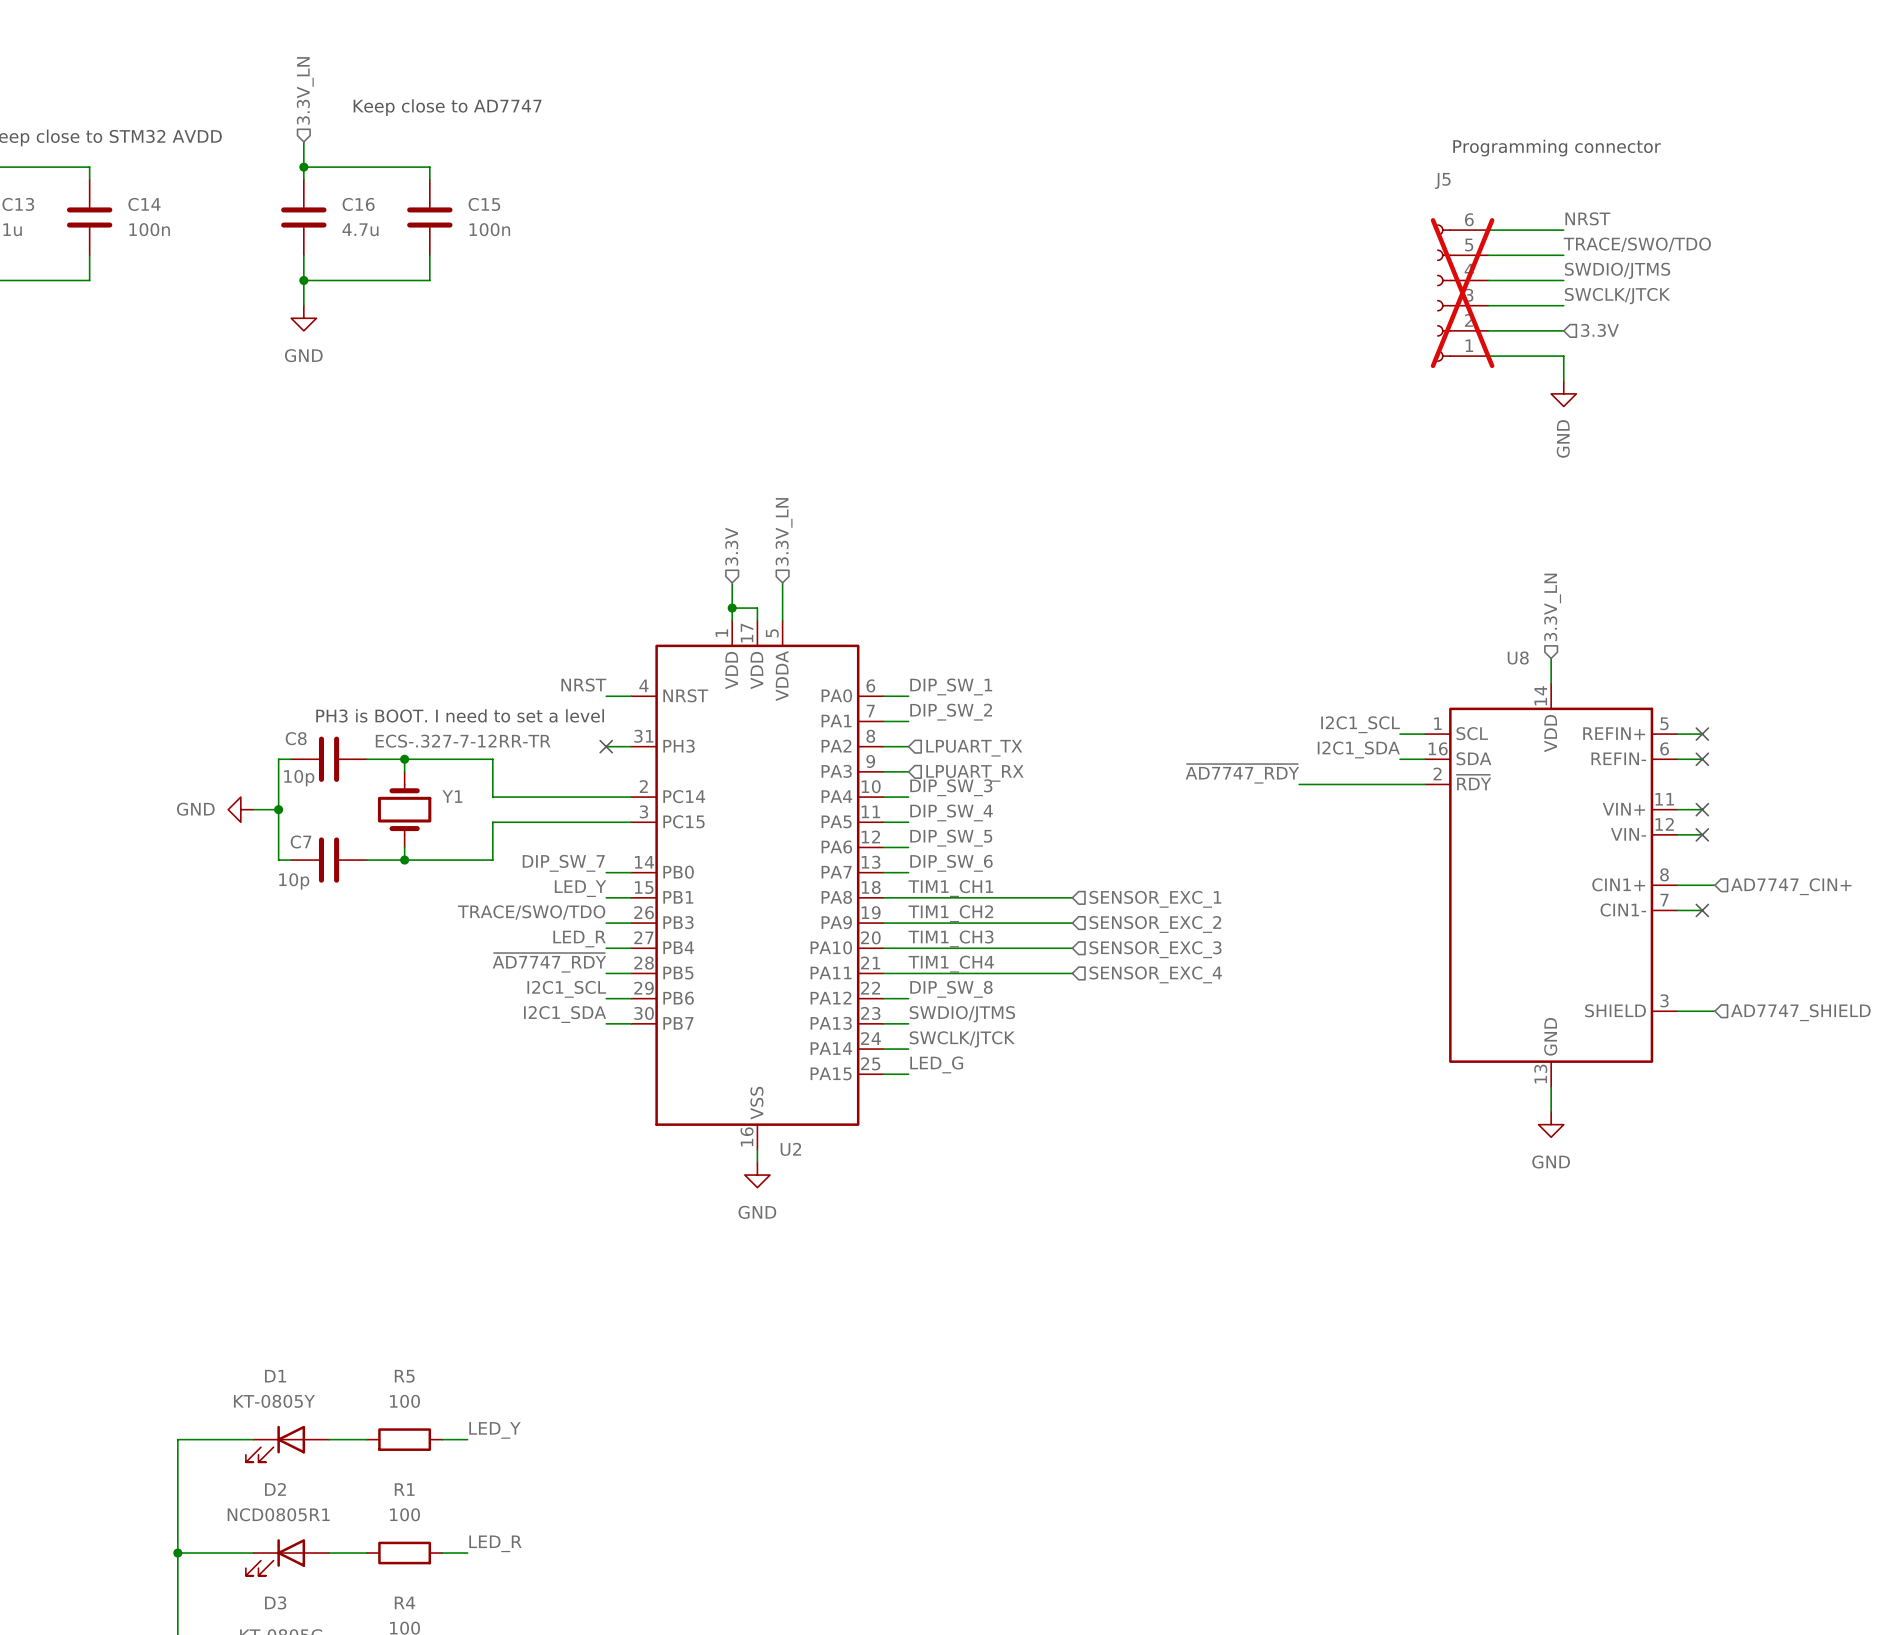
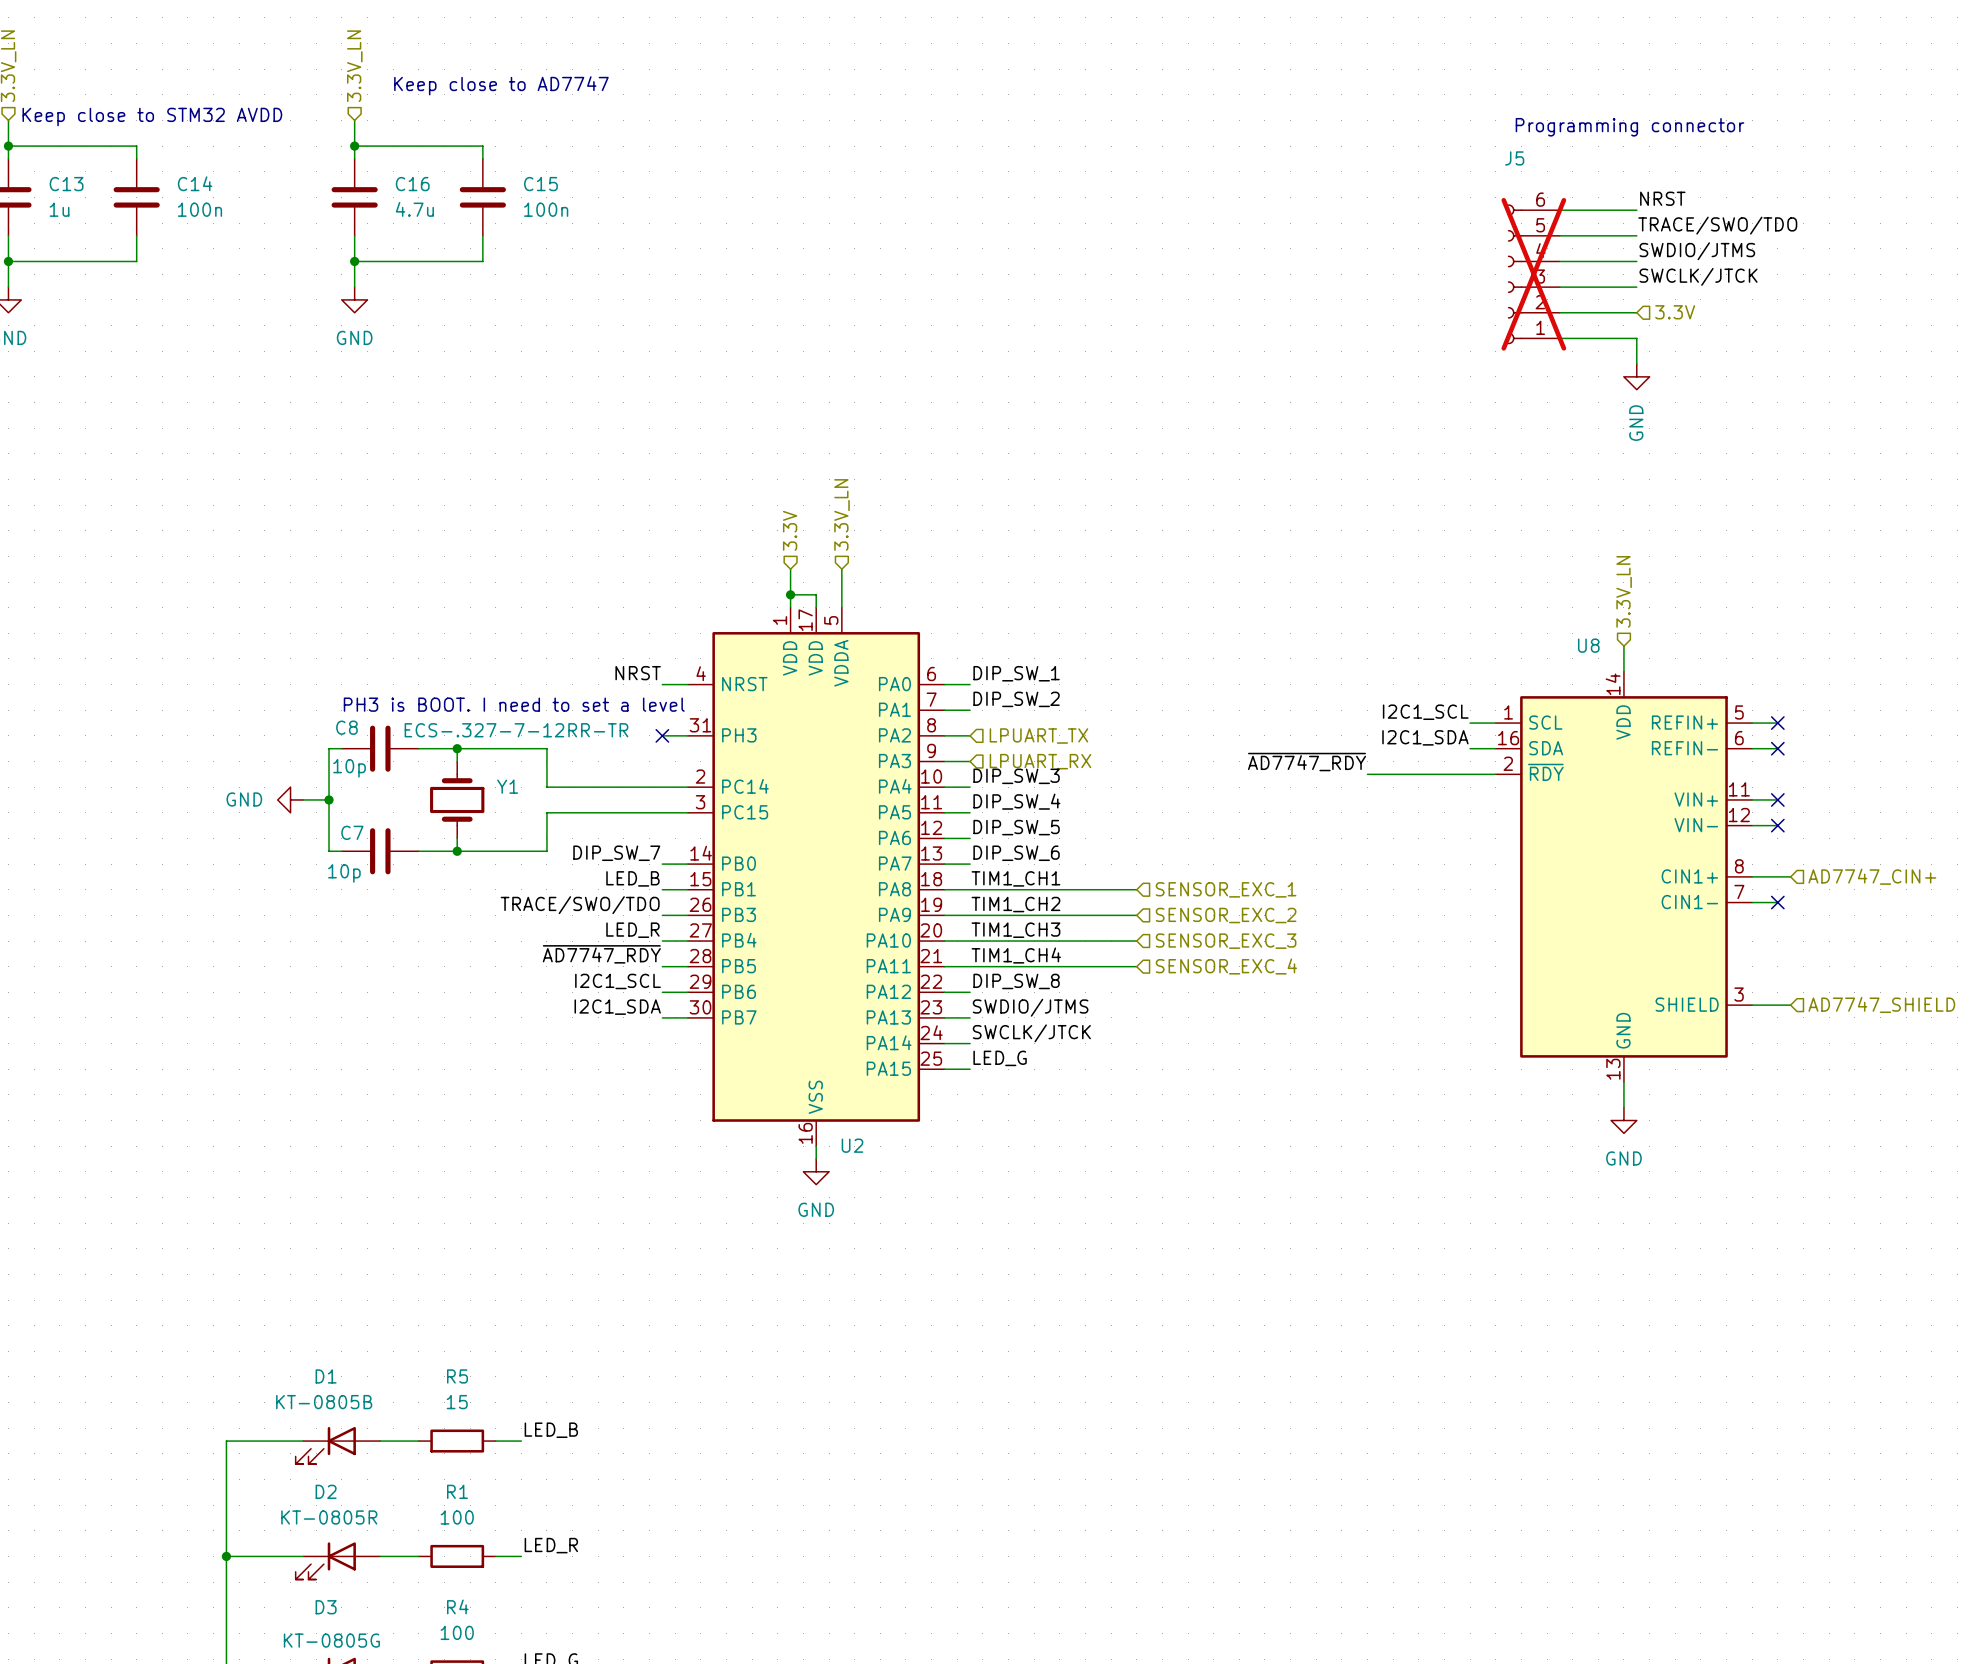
label: LED_Y (580, 888) -> LED_B (632, 878)
D1 text: KT-0805Y (274, 1401) -> KT-0805B (324, 1402)
R5 value: 100 (405, 1401) -> 15 (457, 1402)
label: LED_Y (495, 1430) -> LED_B (551, 1430)
D2 text: NCD0805R1 (278, 1514) -> KT-0805R (329, 1517)

